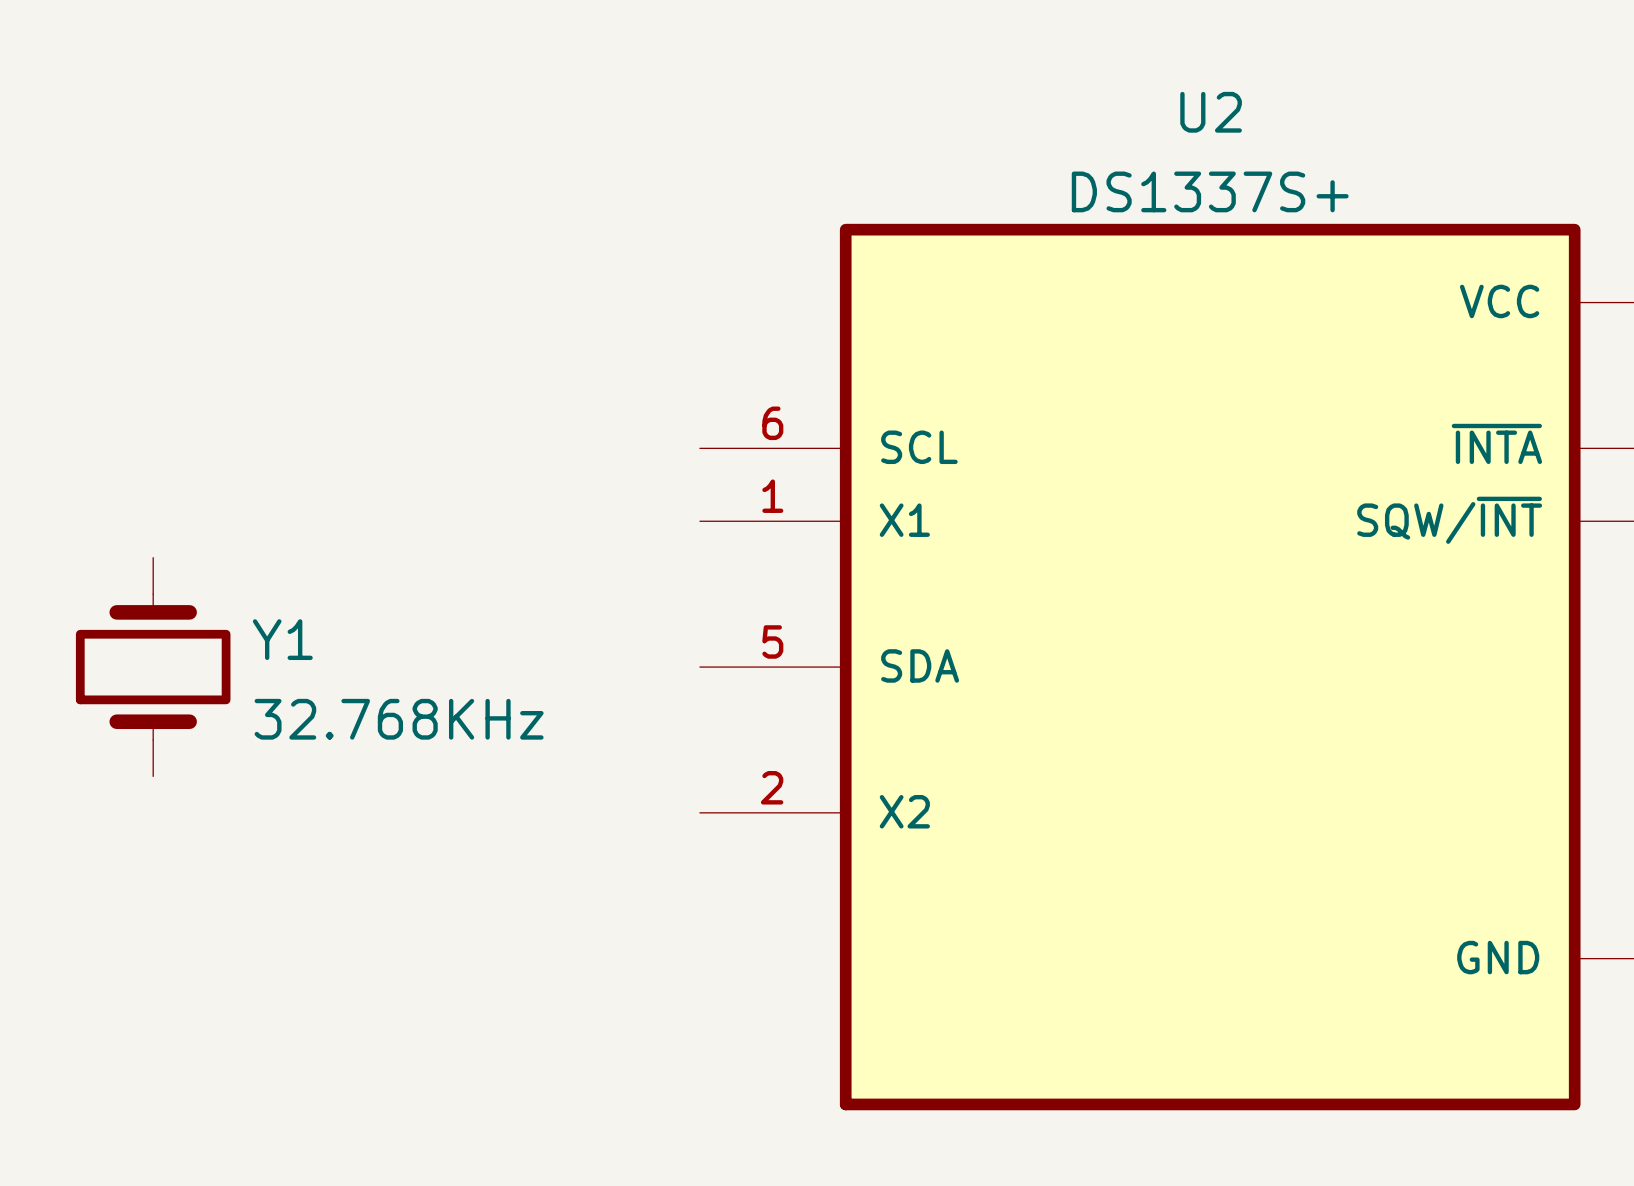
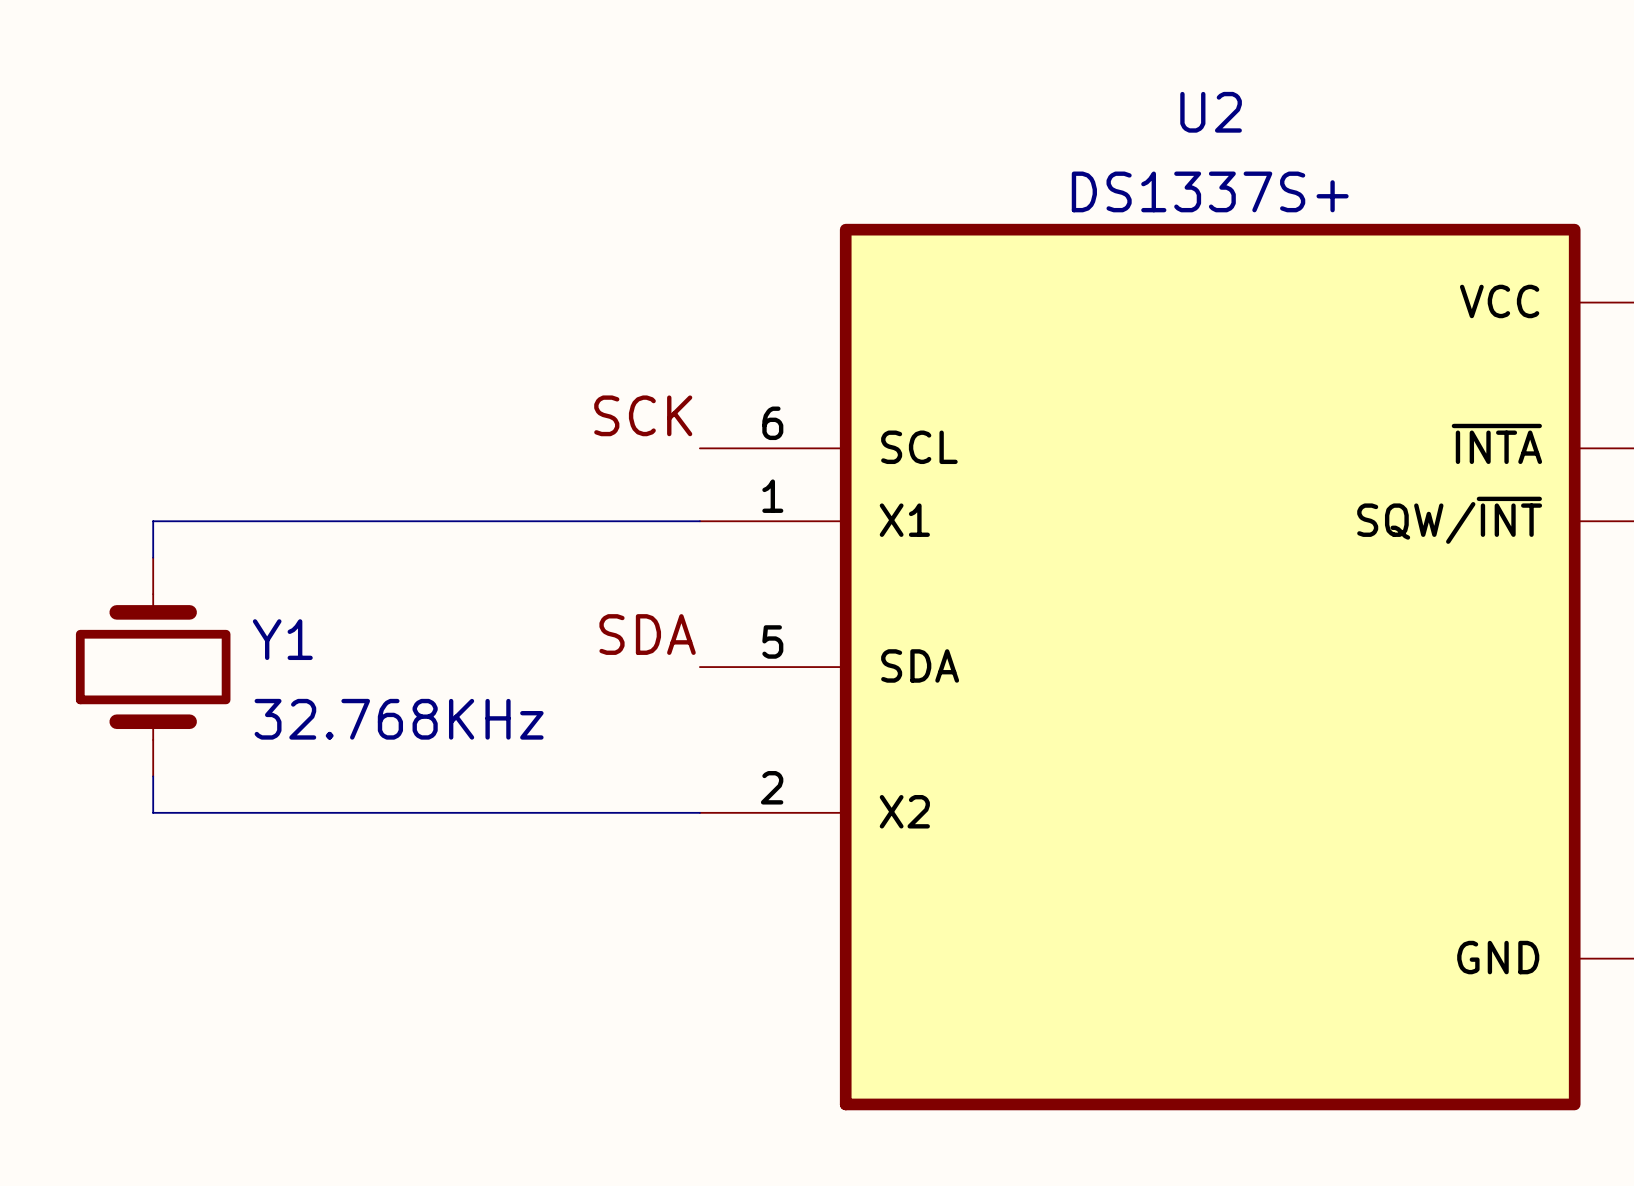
label: none -> SCK (643, 415)
wire: none -> (699, 521) (153, 521) (153, 557)
label: none -> SDA (647, 634)
wire: none -> (153, 776) (153, 812) (699, 812)

